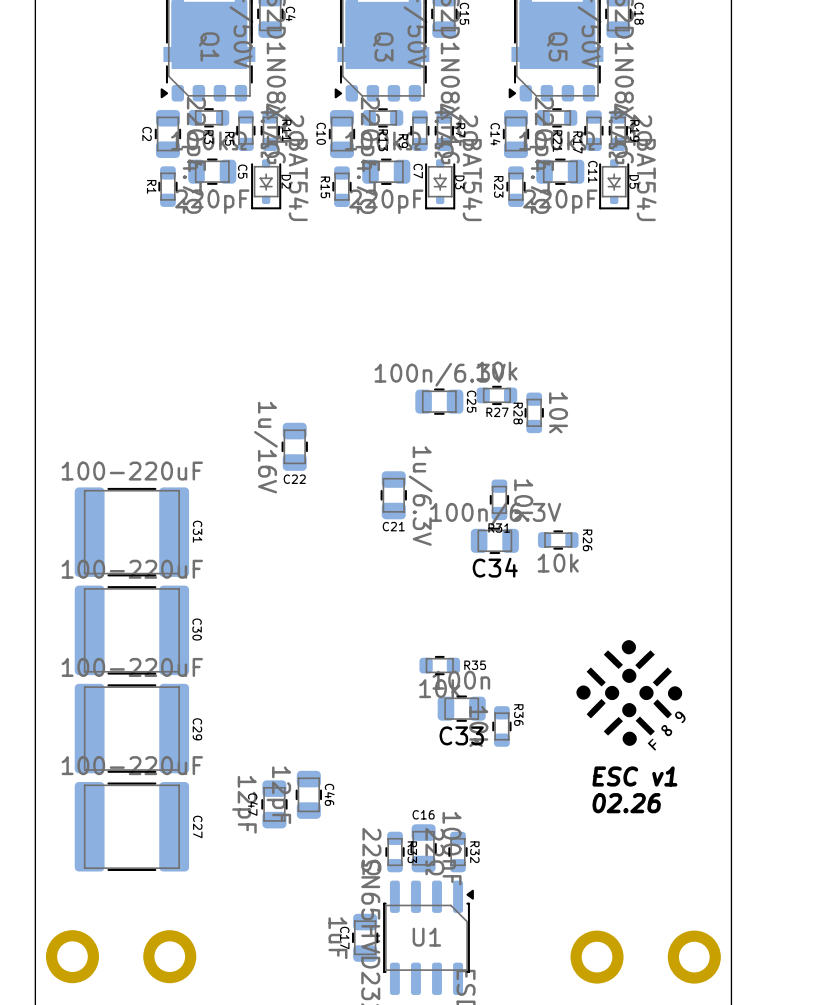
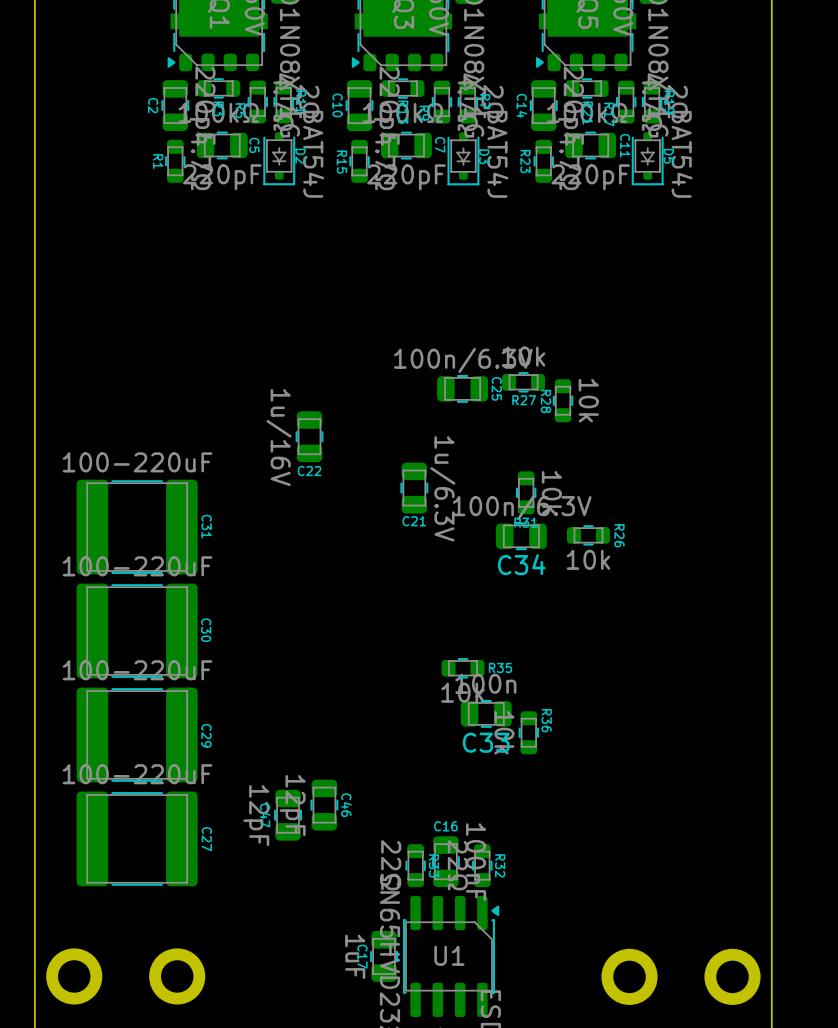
drawing: [576, 640, 686, 751] -> none
text: ESC v1 (634, 776) -> none
text: 02.26 (626, 803) -> none

